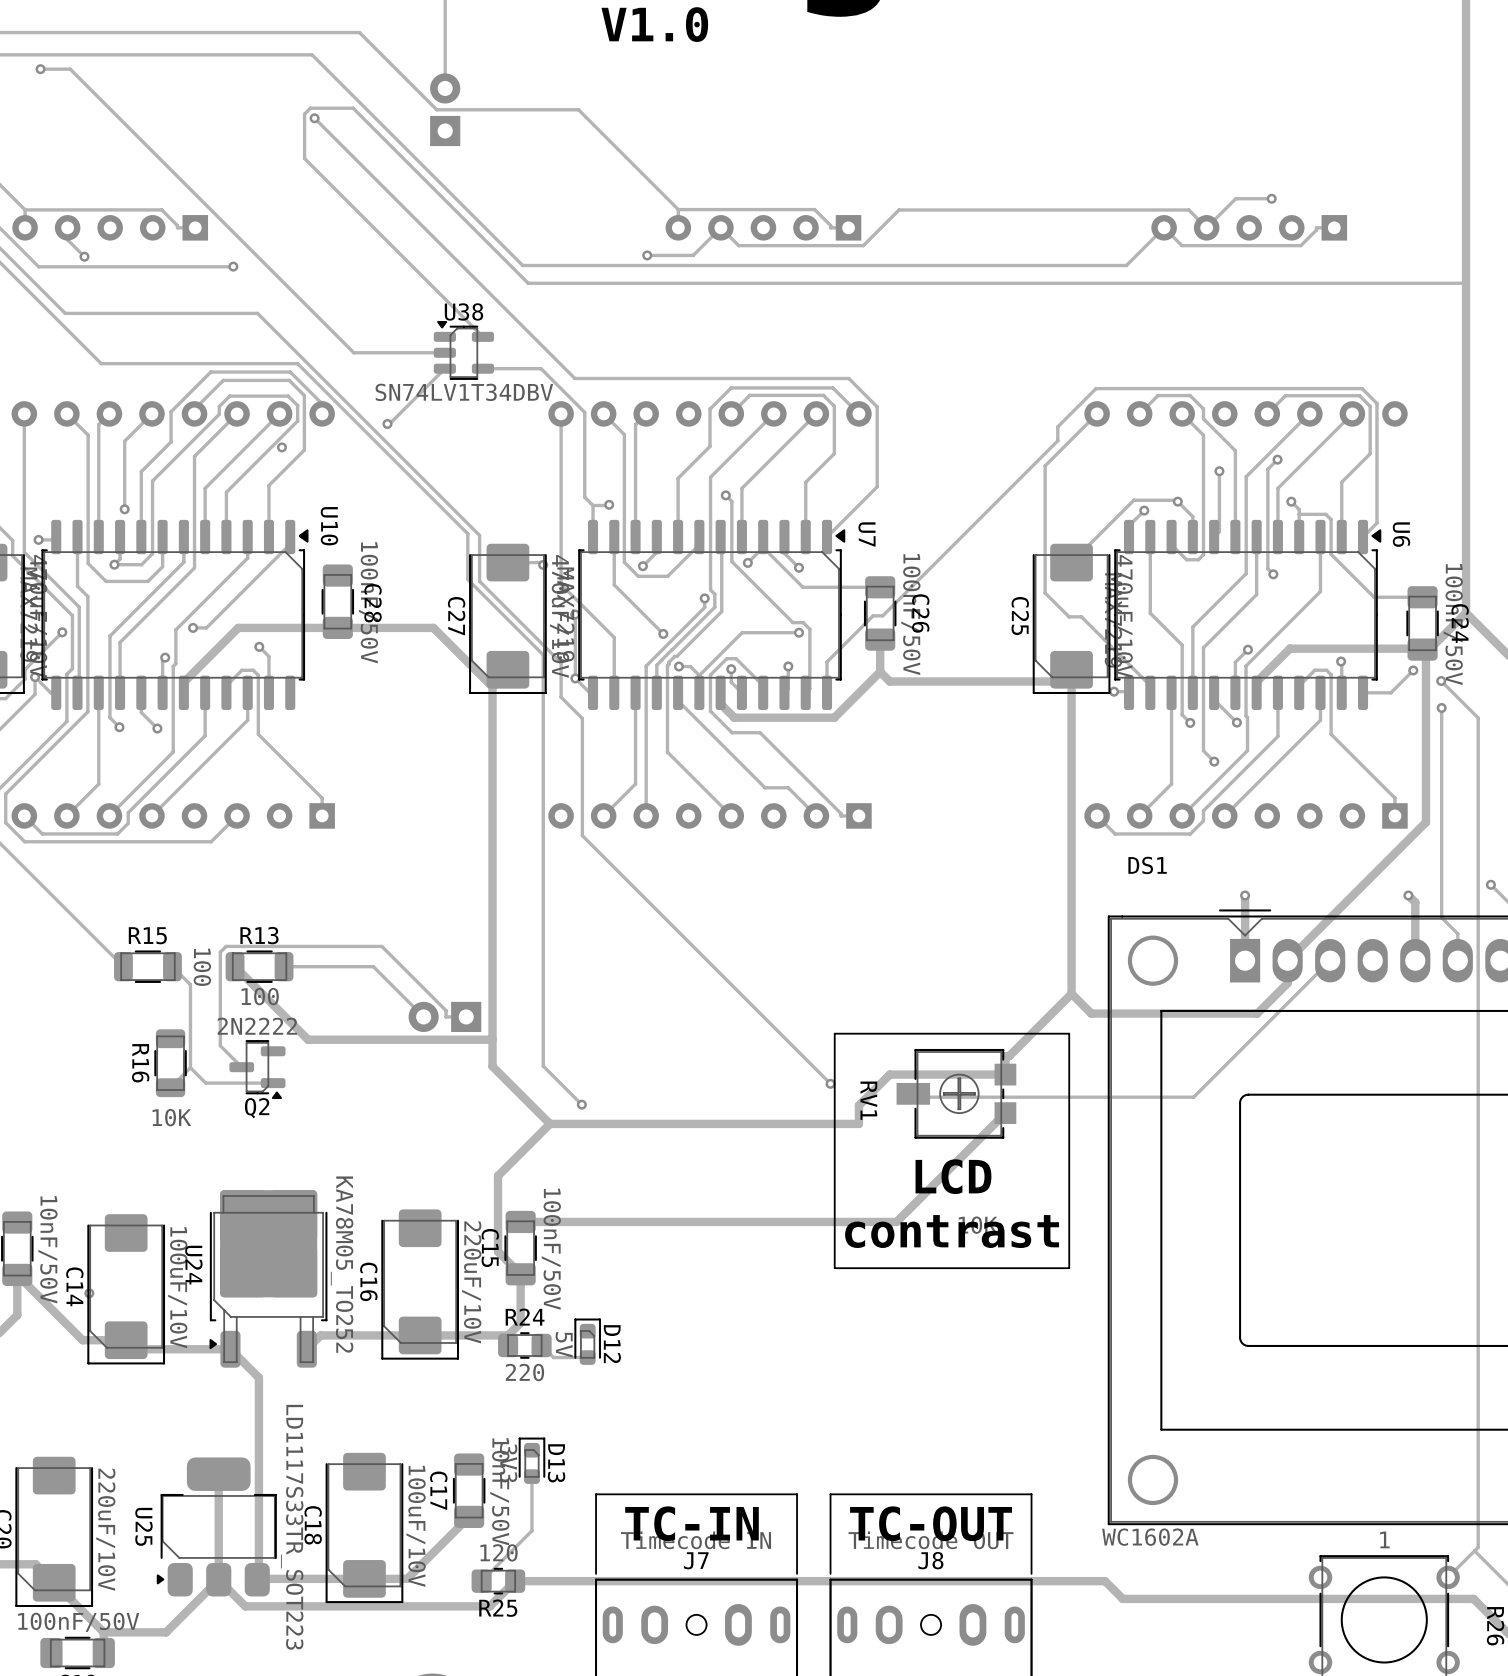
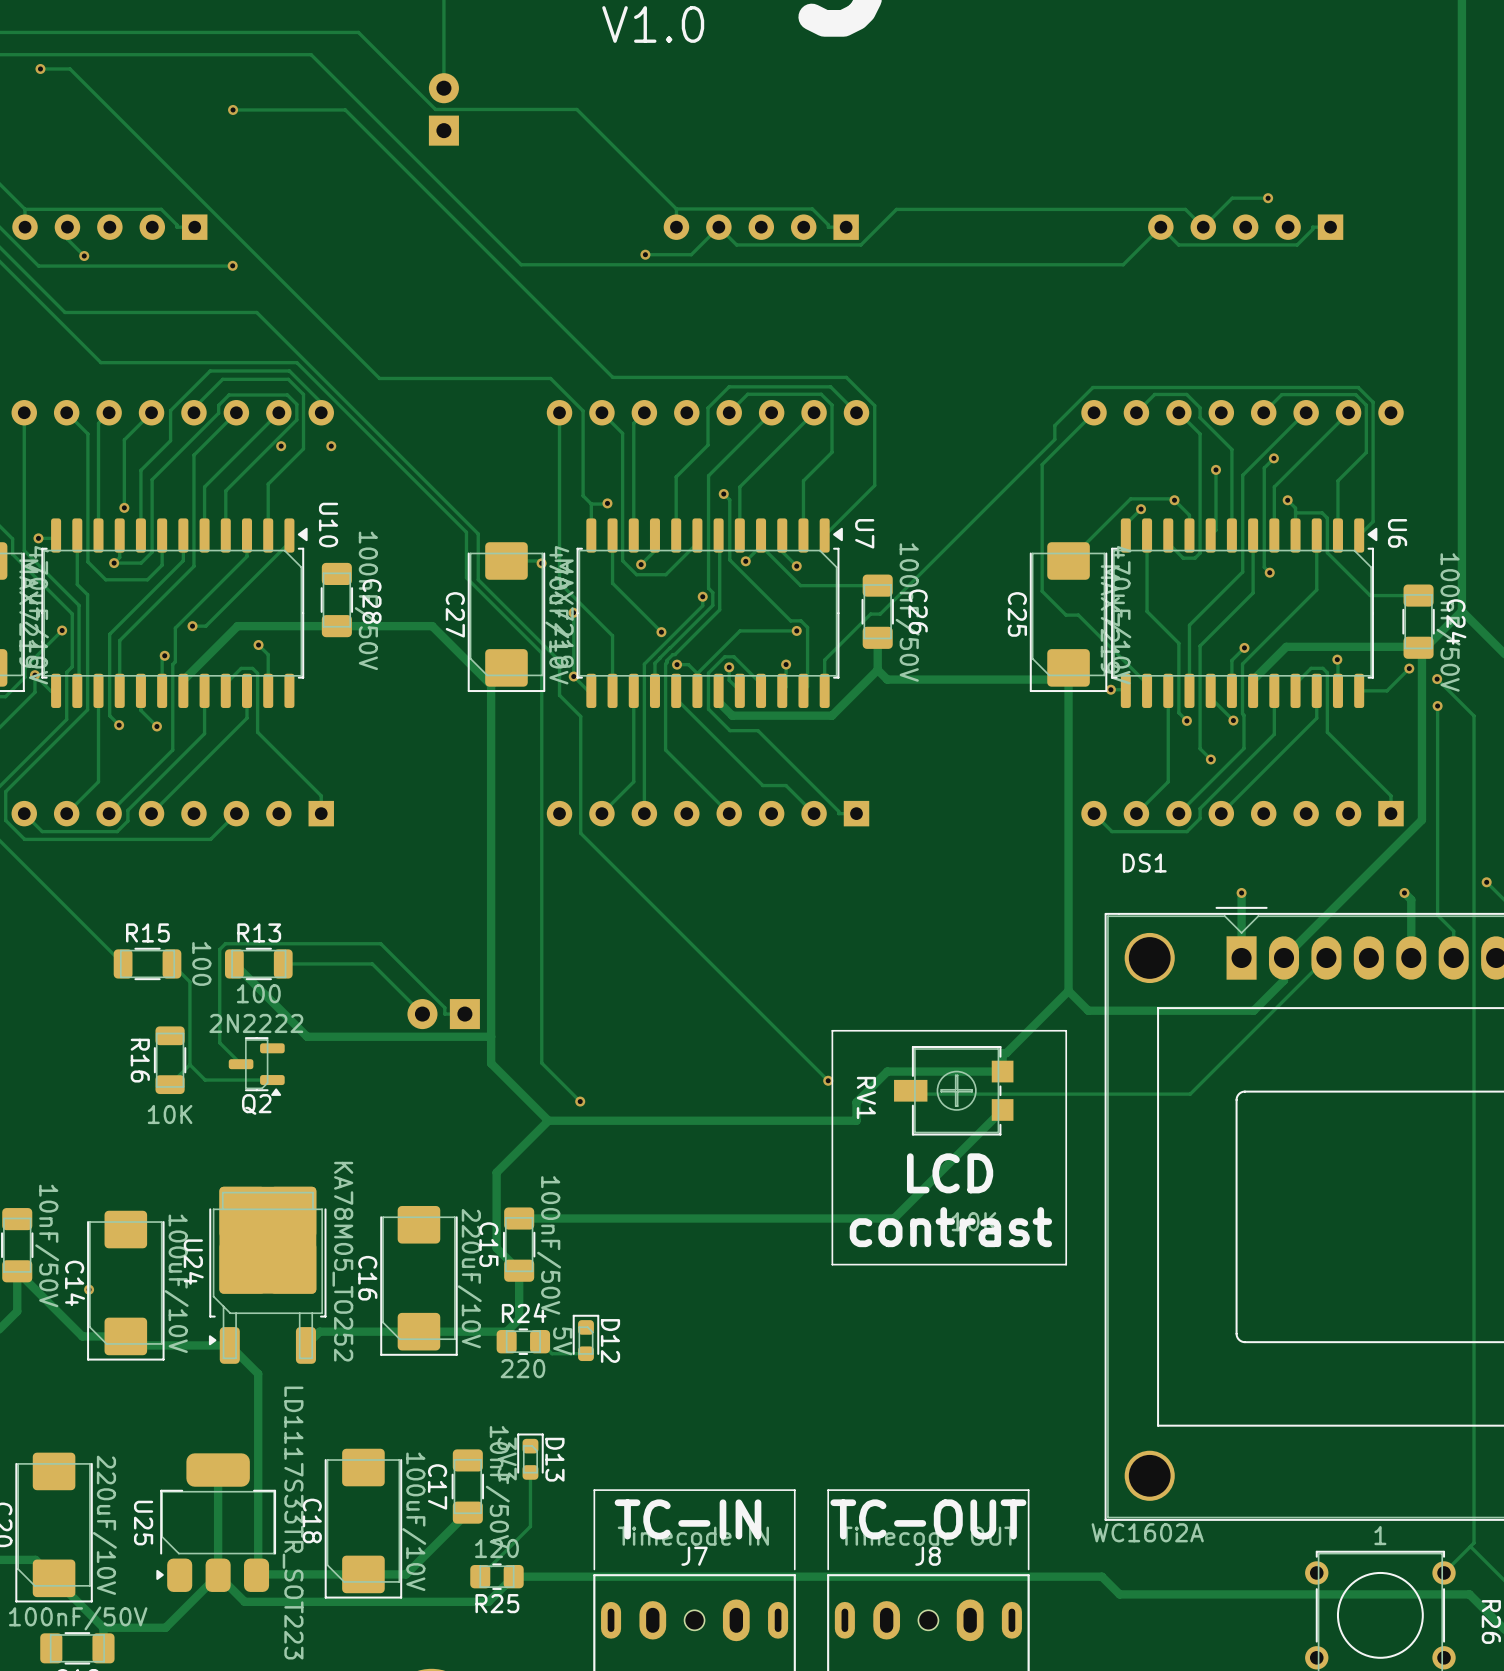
track: (314, 118) (574, 378) (614, 378) -> (233, 109) (345, 109) (612, 377)
via position: (314, 118) -> (233, 109)
track: (1466, 283) (528, 283) (353, 108) (310, 108) (304, 114) (304, 158) (482, 336) -> none
U38: SN74LV1T34DBV (463, 350) -> none
track: (444, 352) (353, 352) -> none
track: (444, 368) (387, 423) -> none
track: (482, 368) (541, 368) (584, 412) -> (352, 351) (379, 378) (550, 378) (583, 410)
via position: (387, 423) -> (331, 446)

